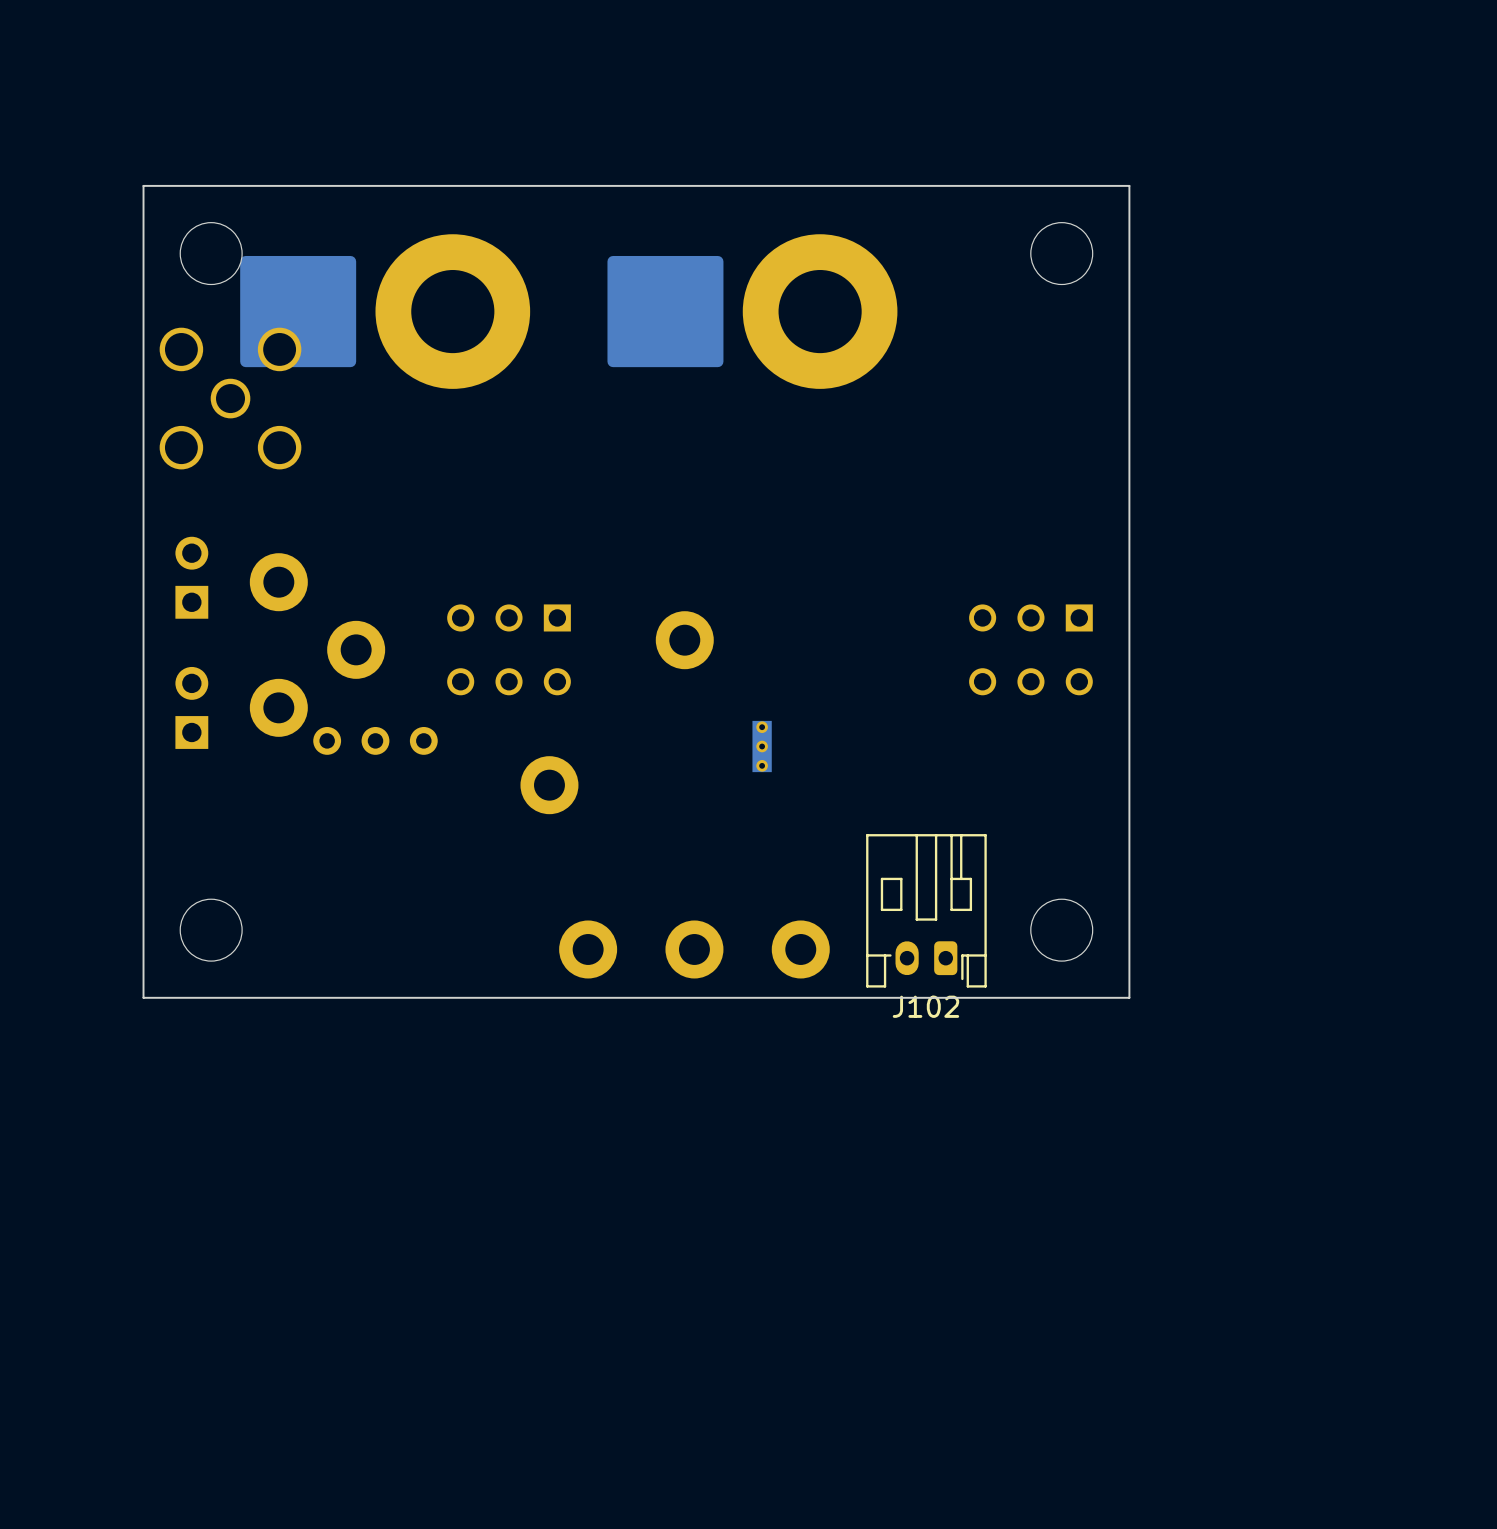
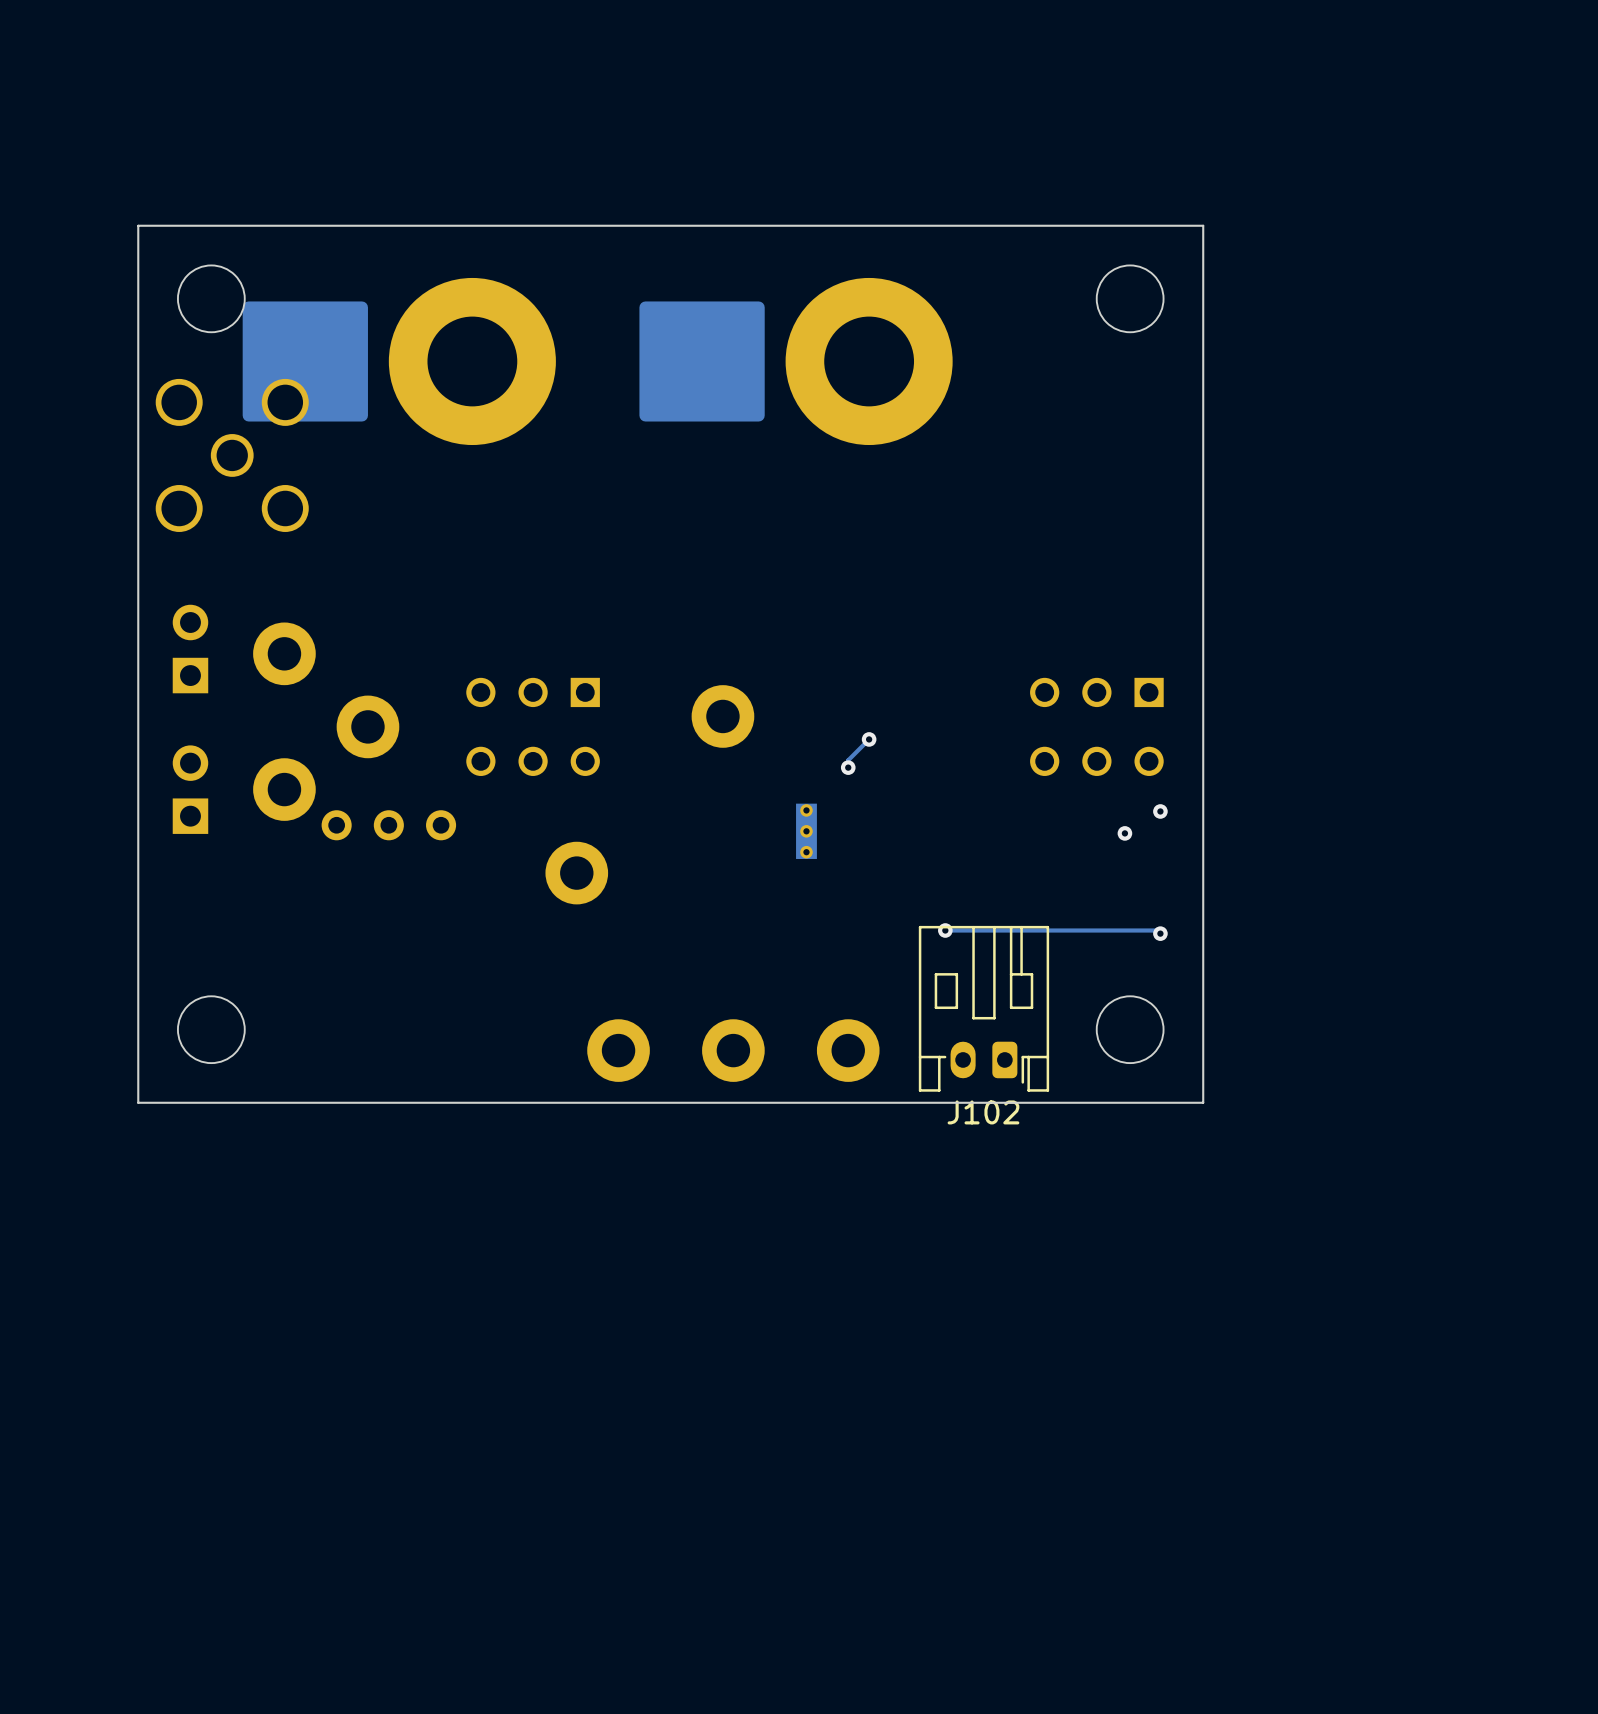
track: none -> (869, 739) (848, 760) (848, 767)
via: none -> (869, 739)
via: none -> (848, 767)
via: none -> (1160, 811)
via: none -> (1124, 833)
track: none -> (945, 930) (1157, 930) (1160, 933)
via: none -> (945, 930)
via: none -> (1160, 933)

